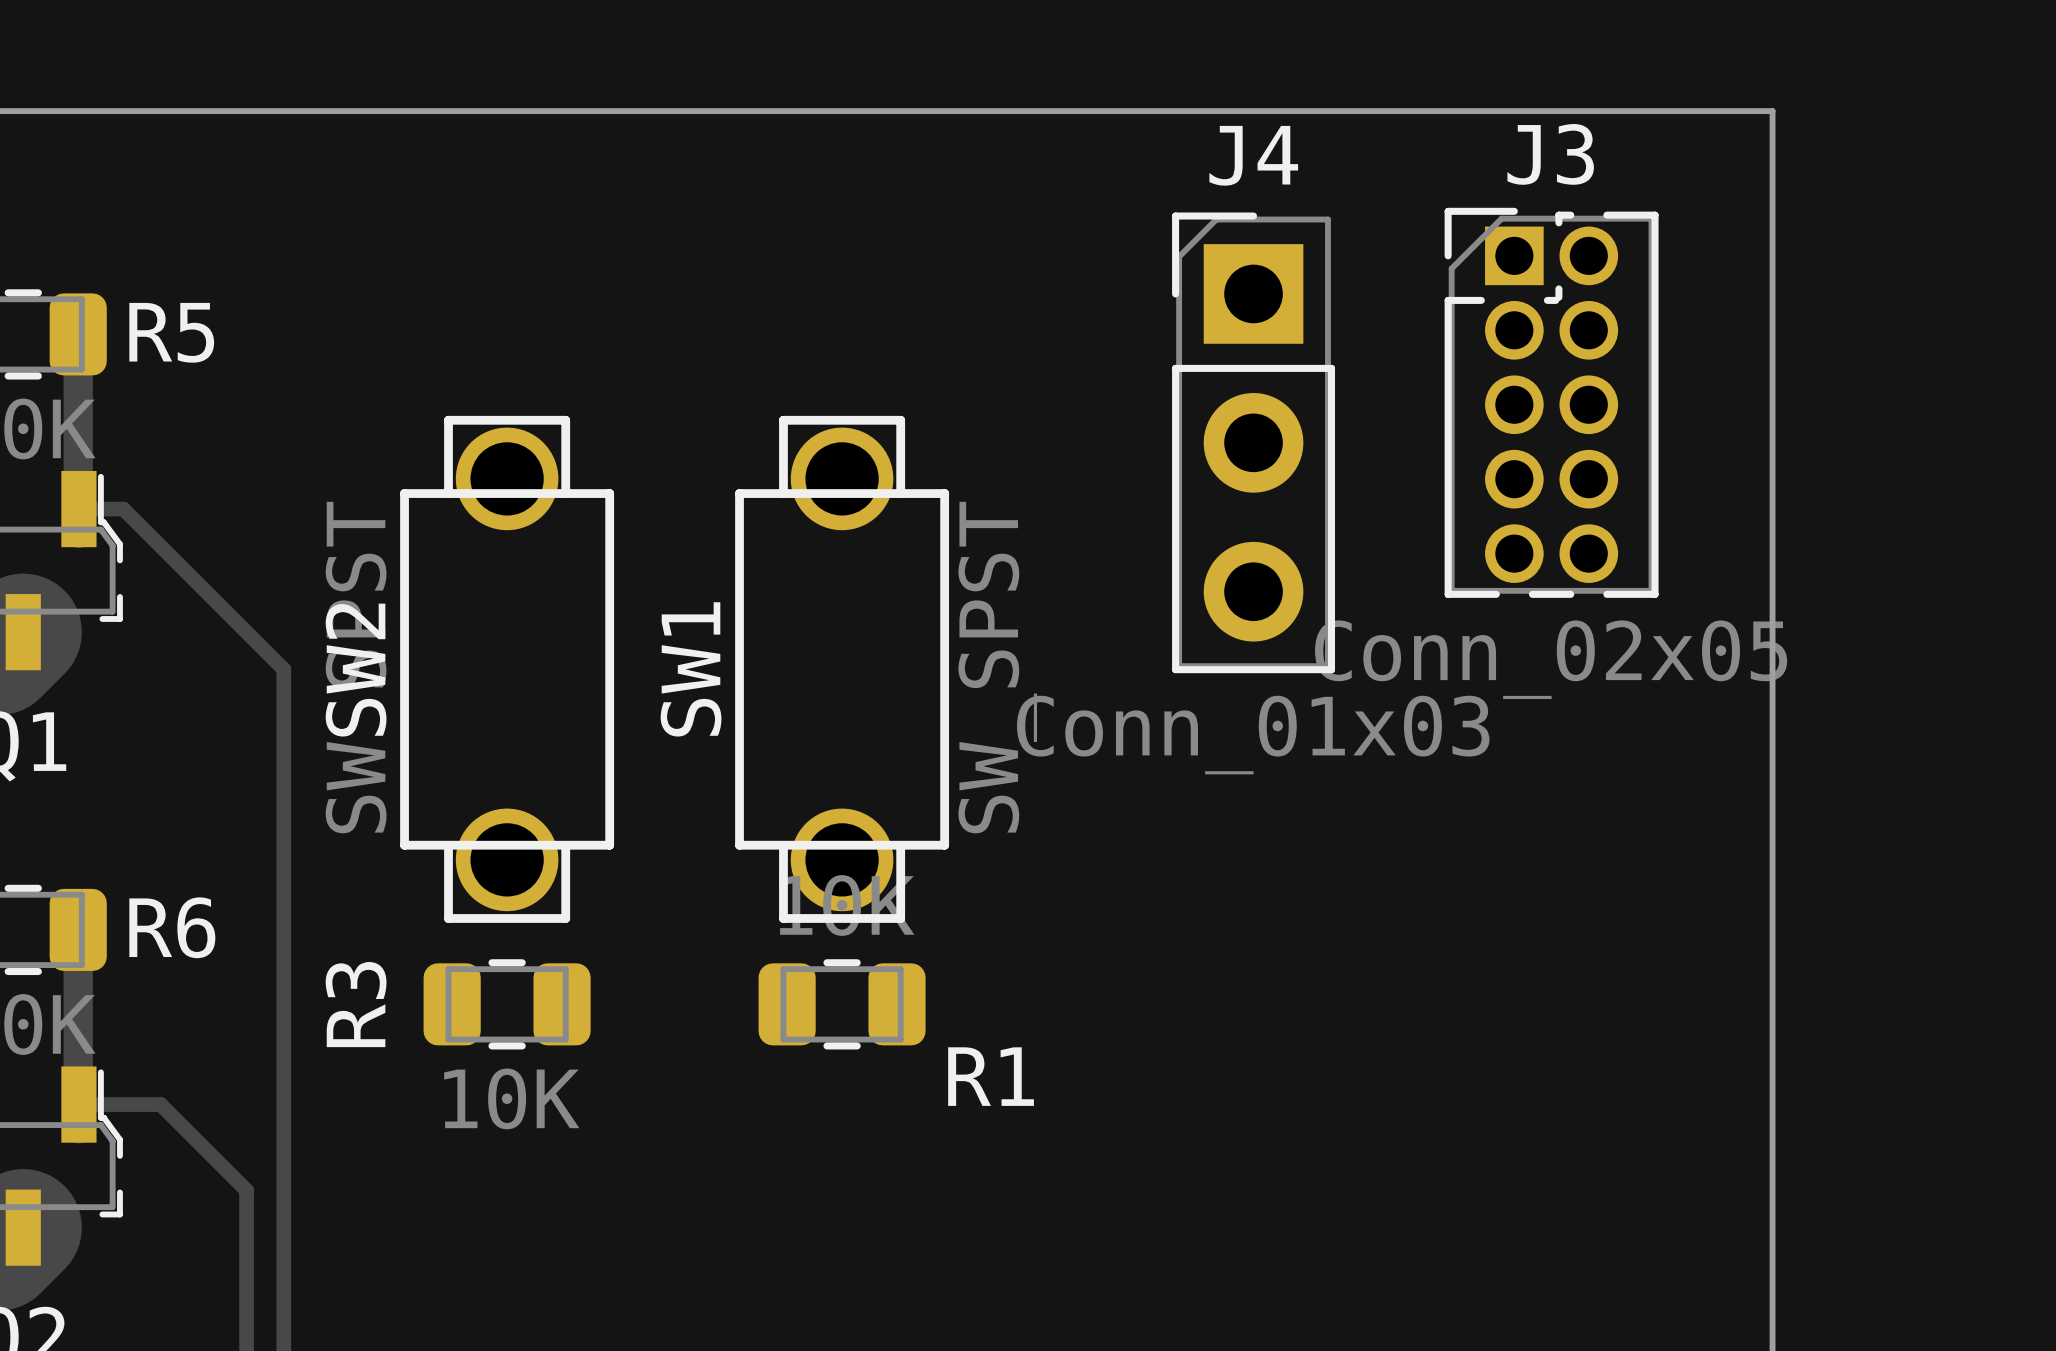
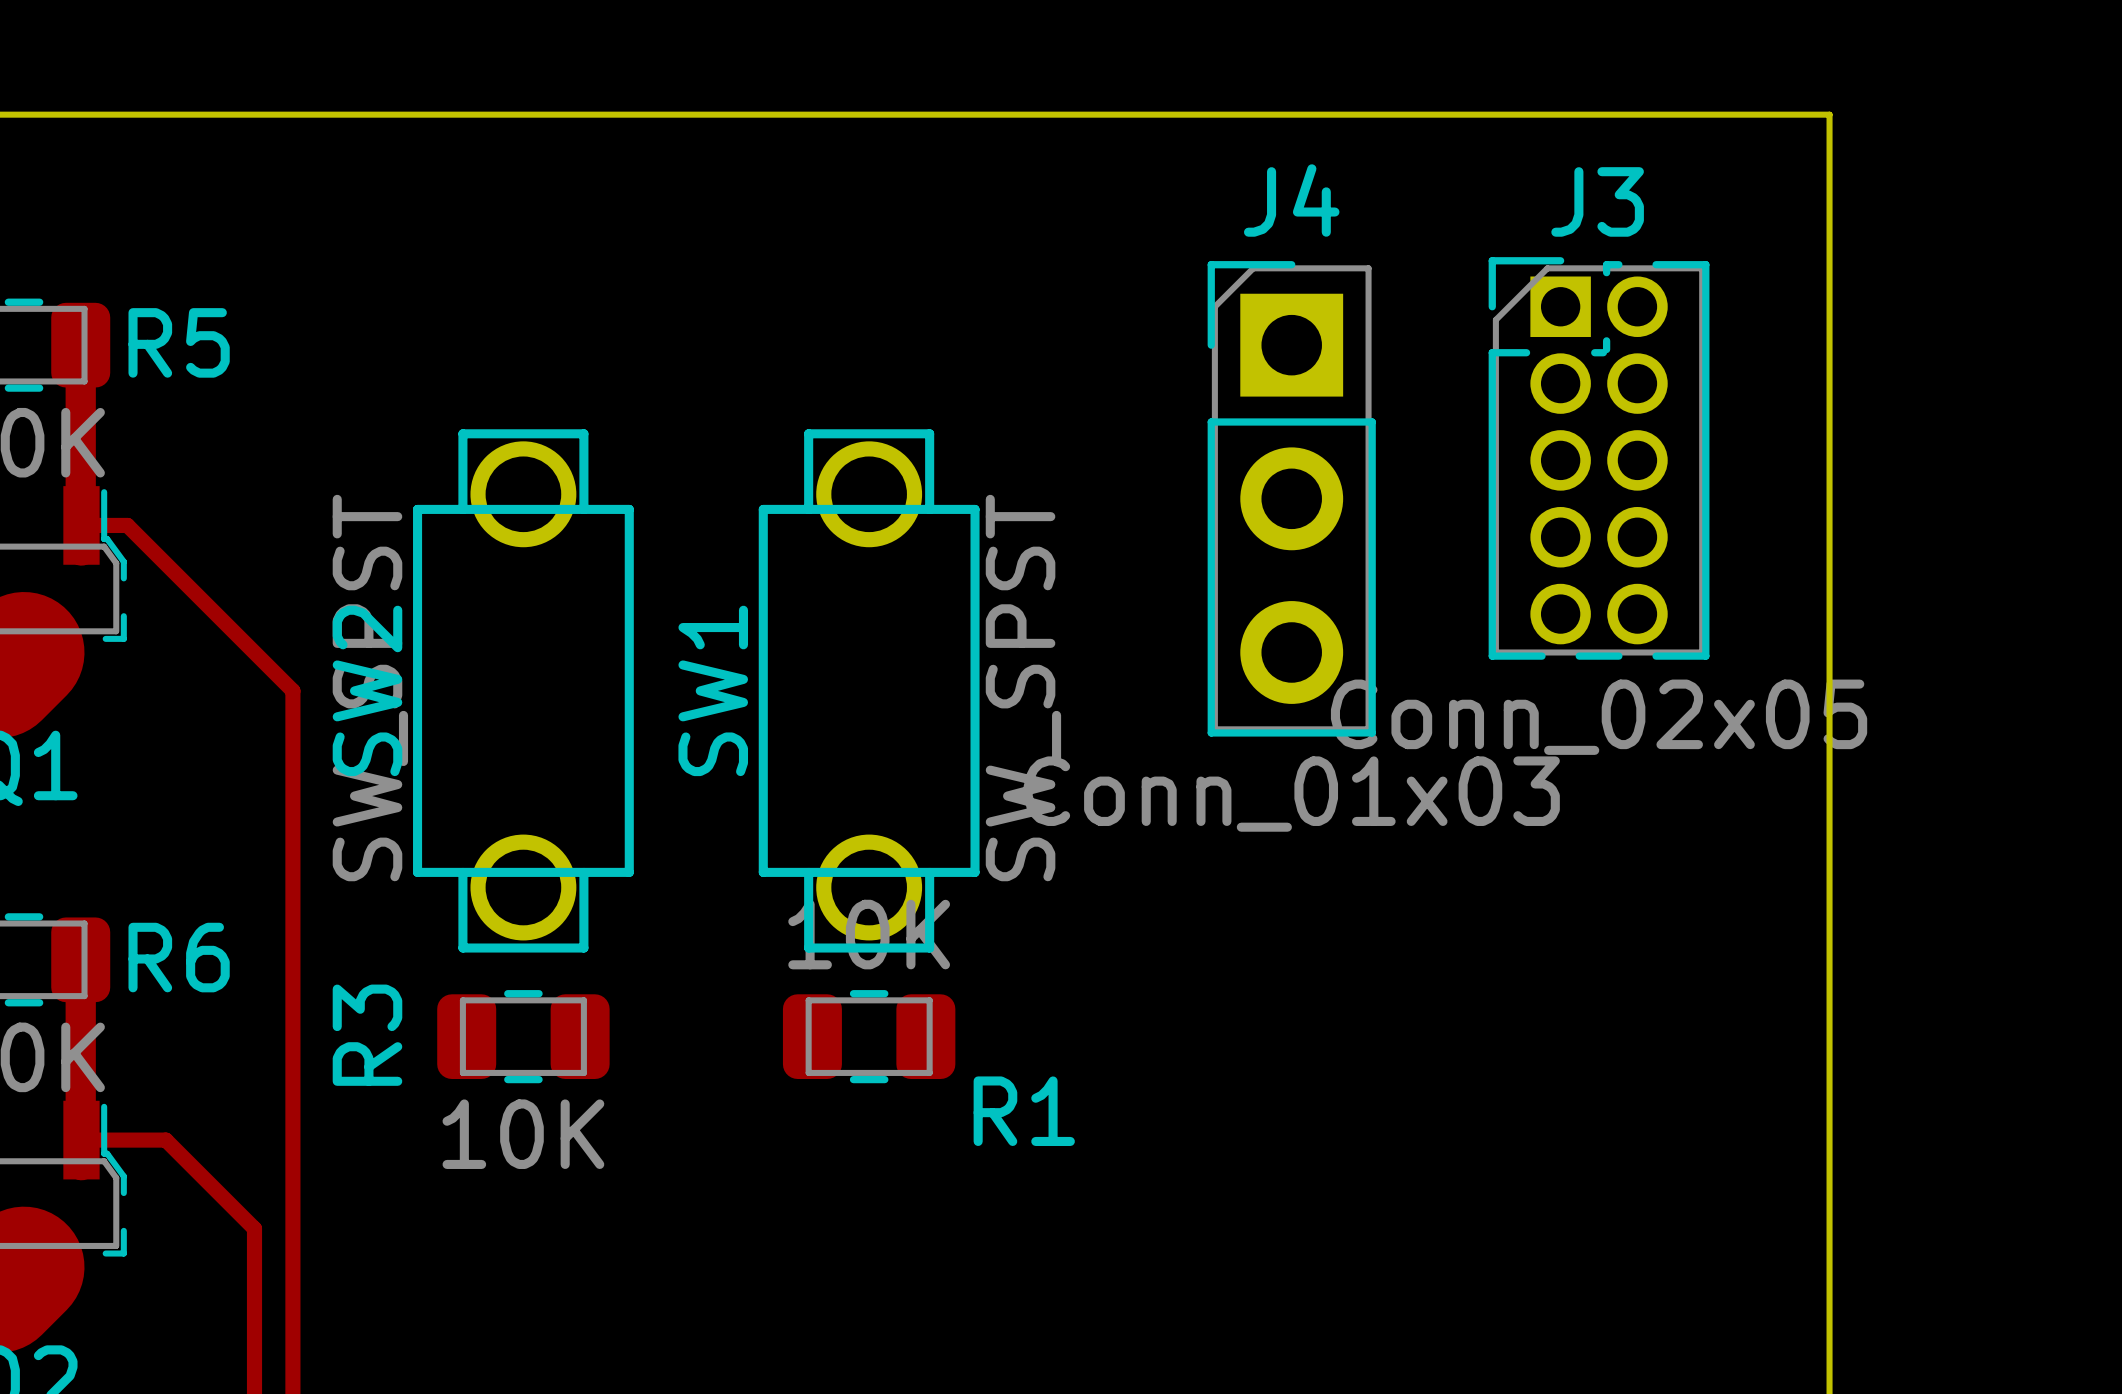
J3 position: (1551, 402) -> (1599, 458)
J4 position: (1253, 442) -> (1291, 498)

